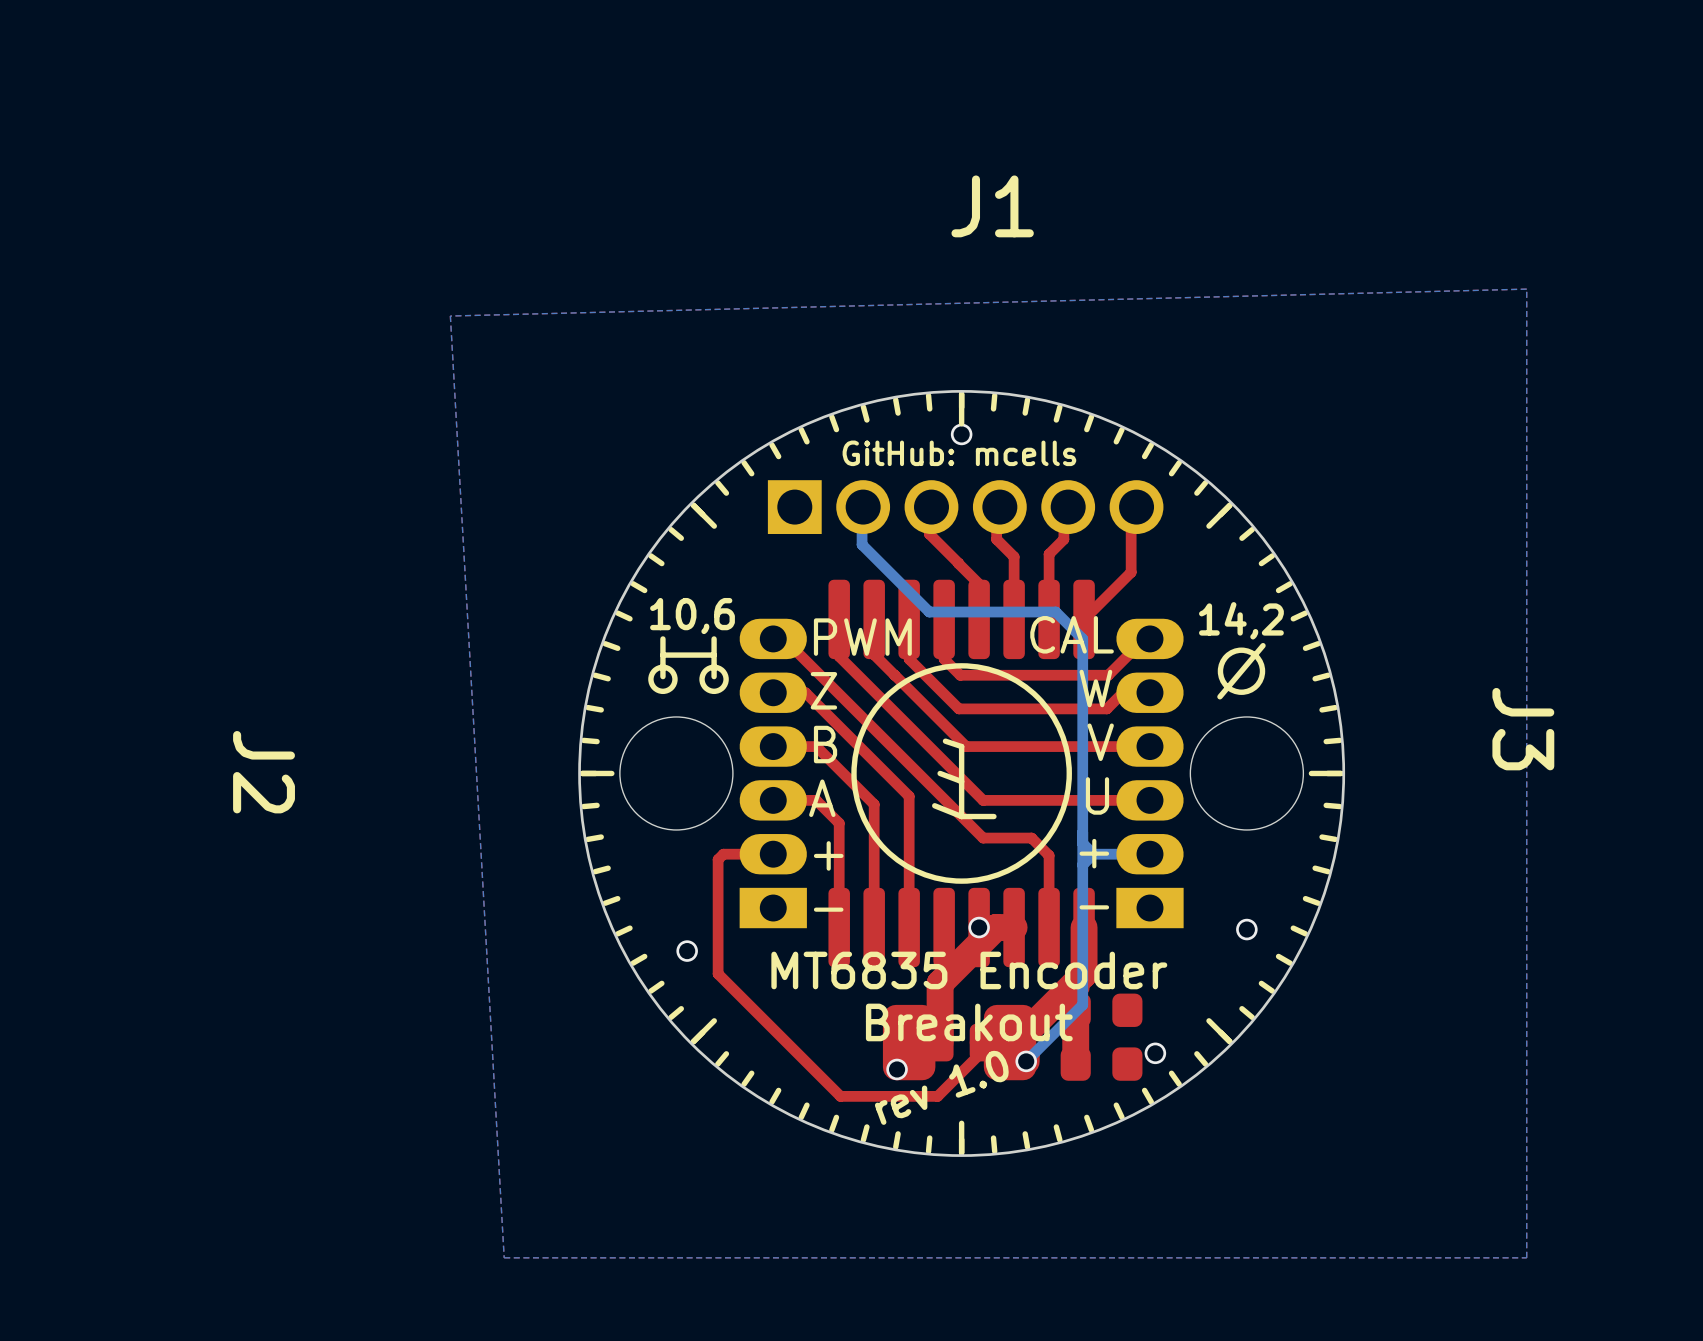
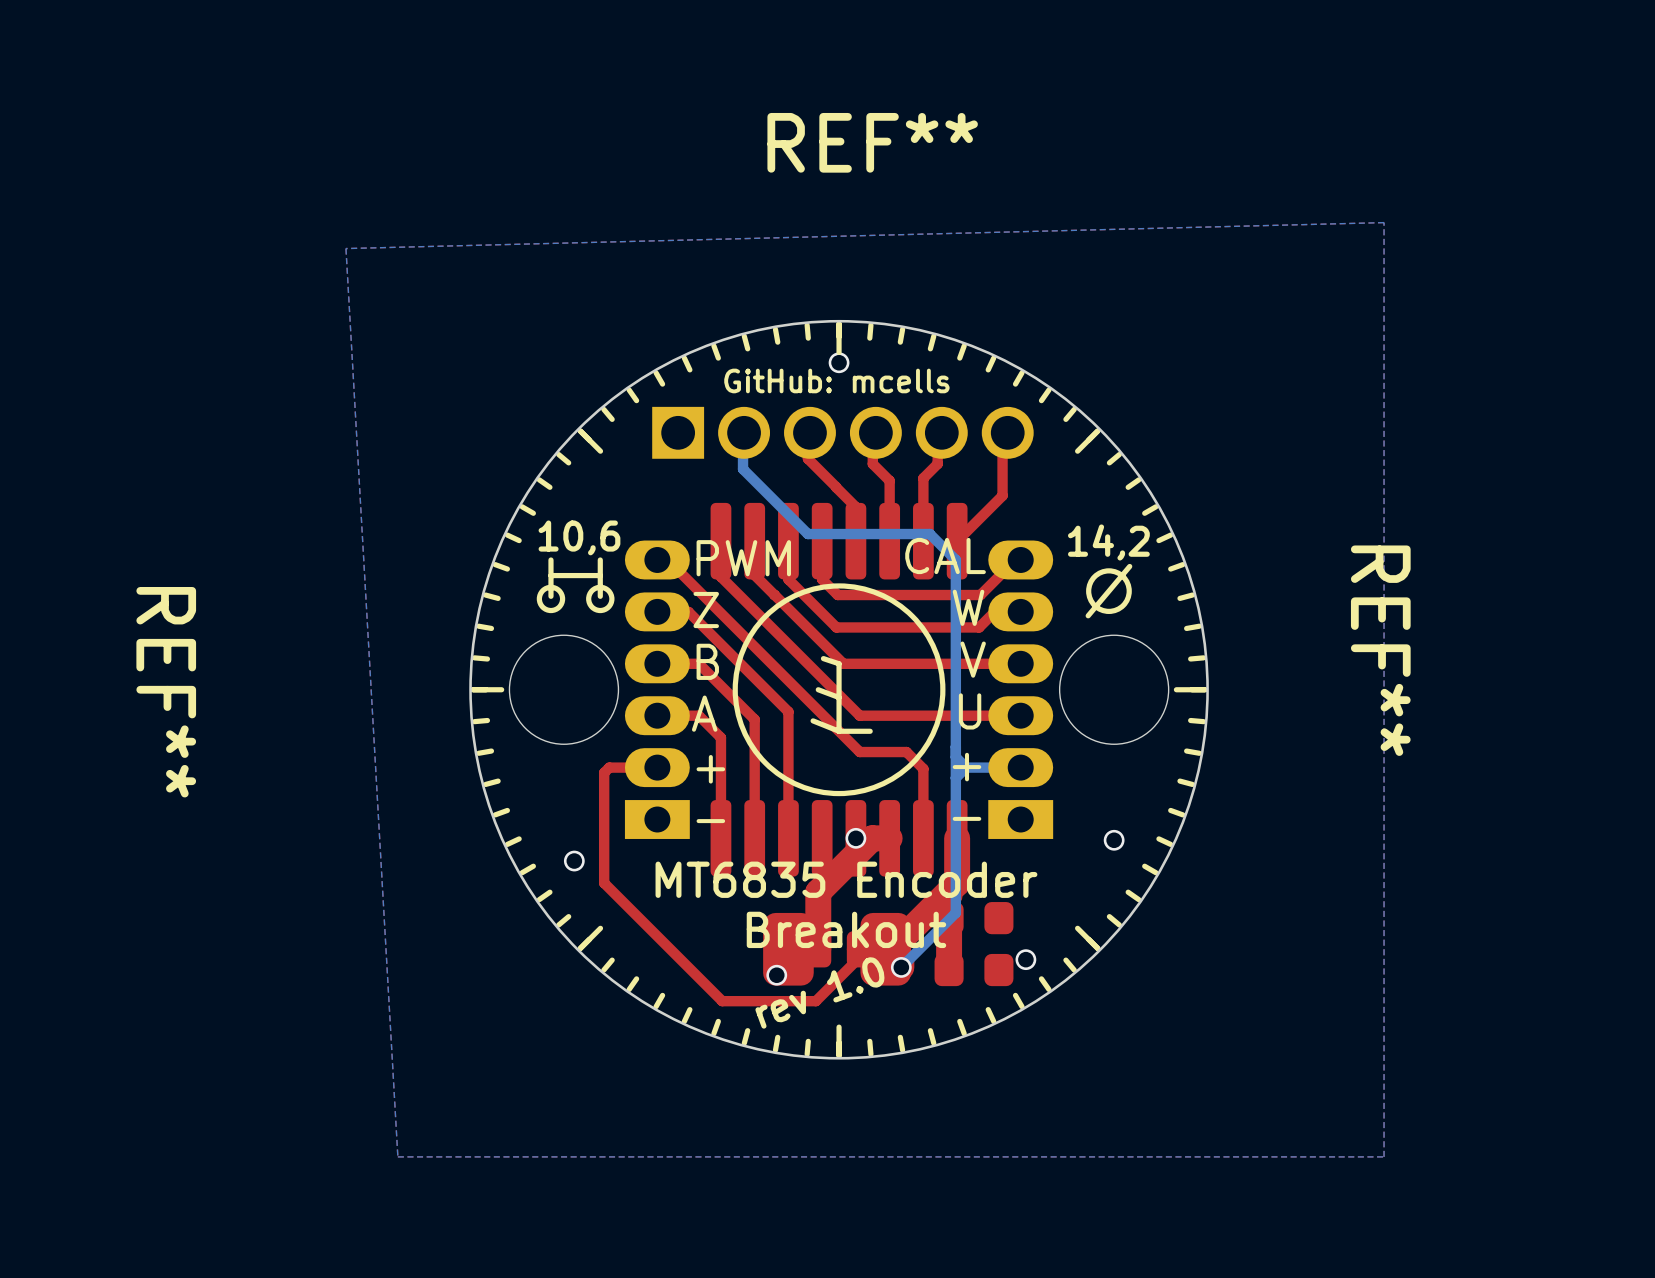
J1 name: J1 (992, 206) -> REF** (872, 142)
J3 name: J3 (1523, 729) -> REF** (1380, 650)
J2 name: J2 (264, 772) -> REF** (166, 692)

